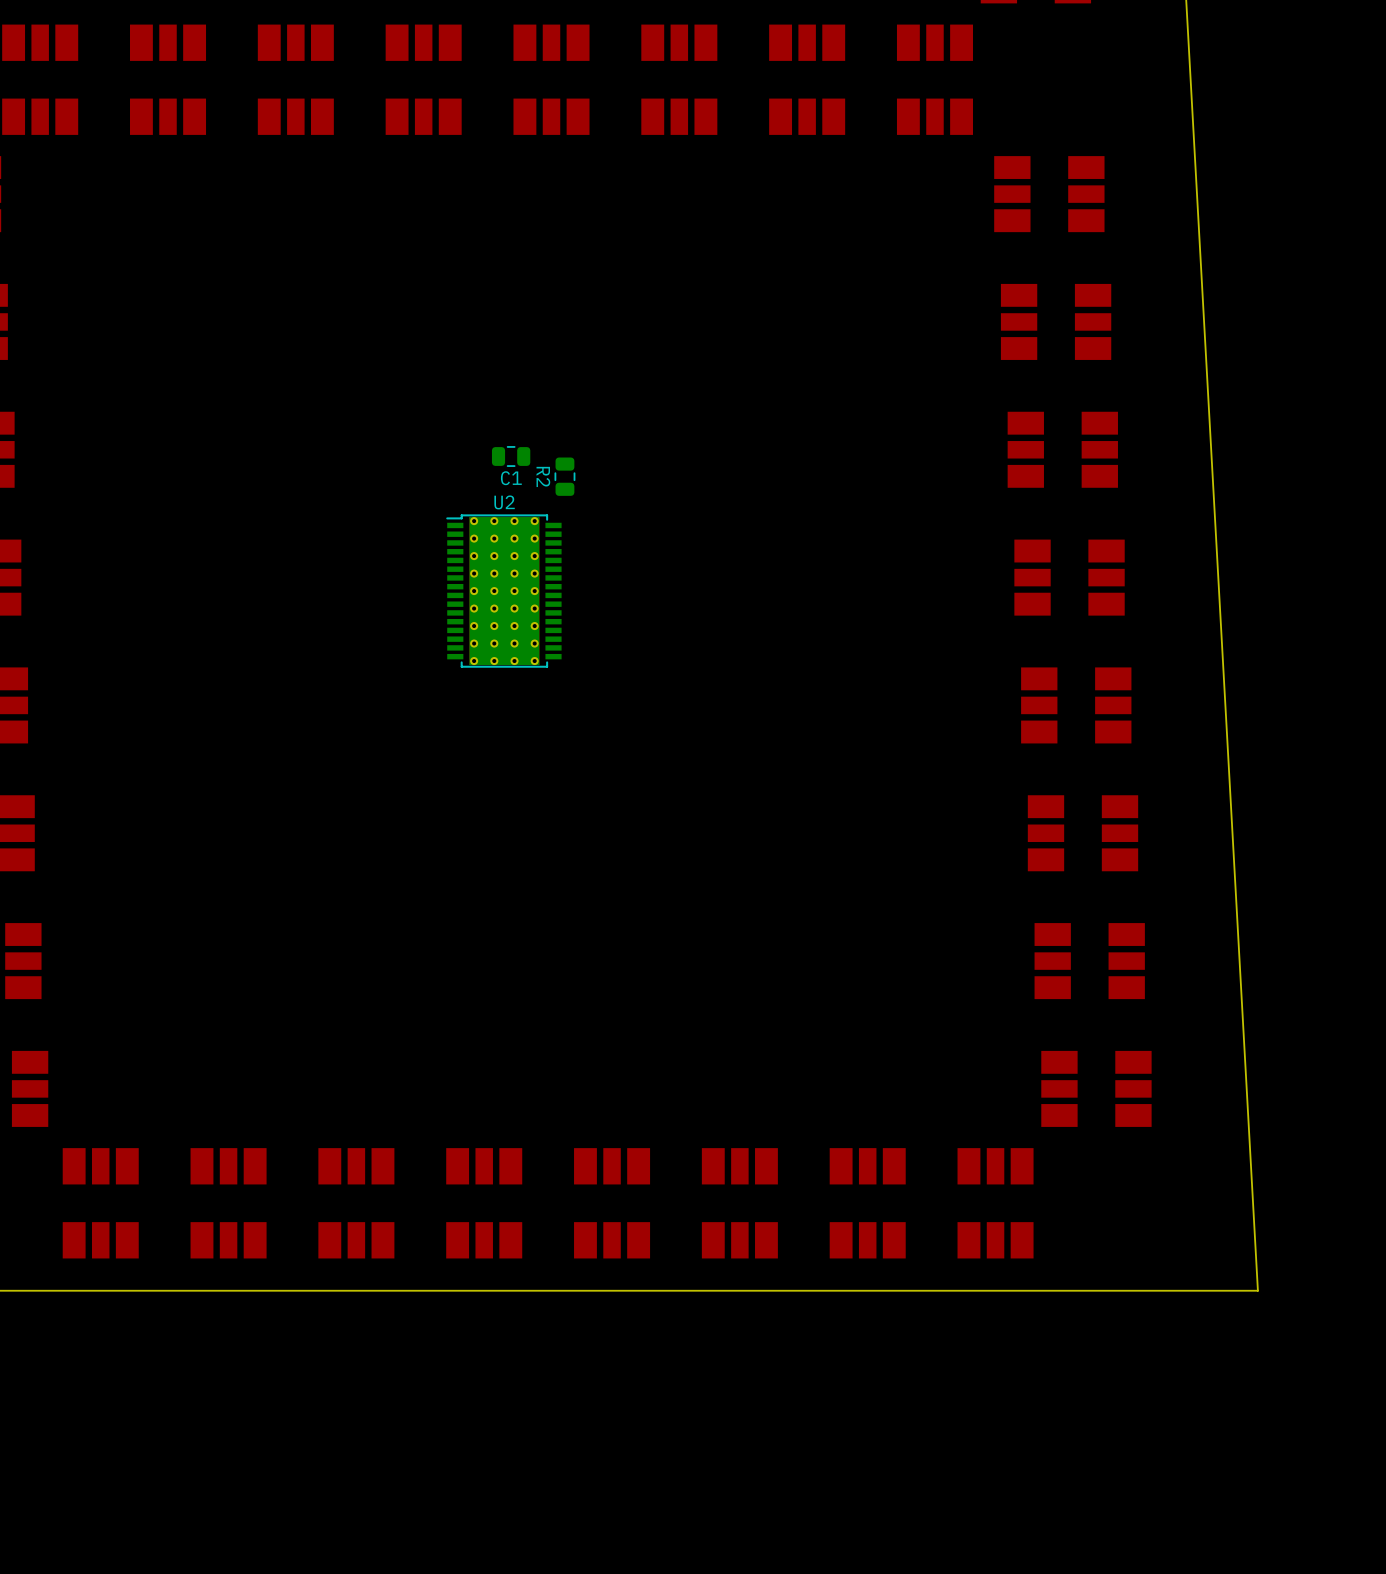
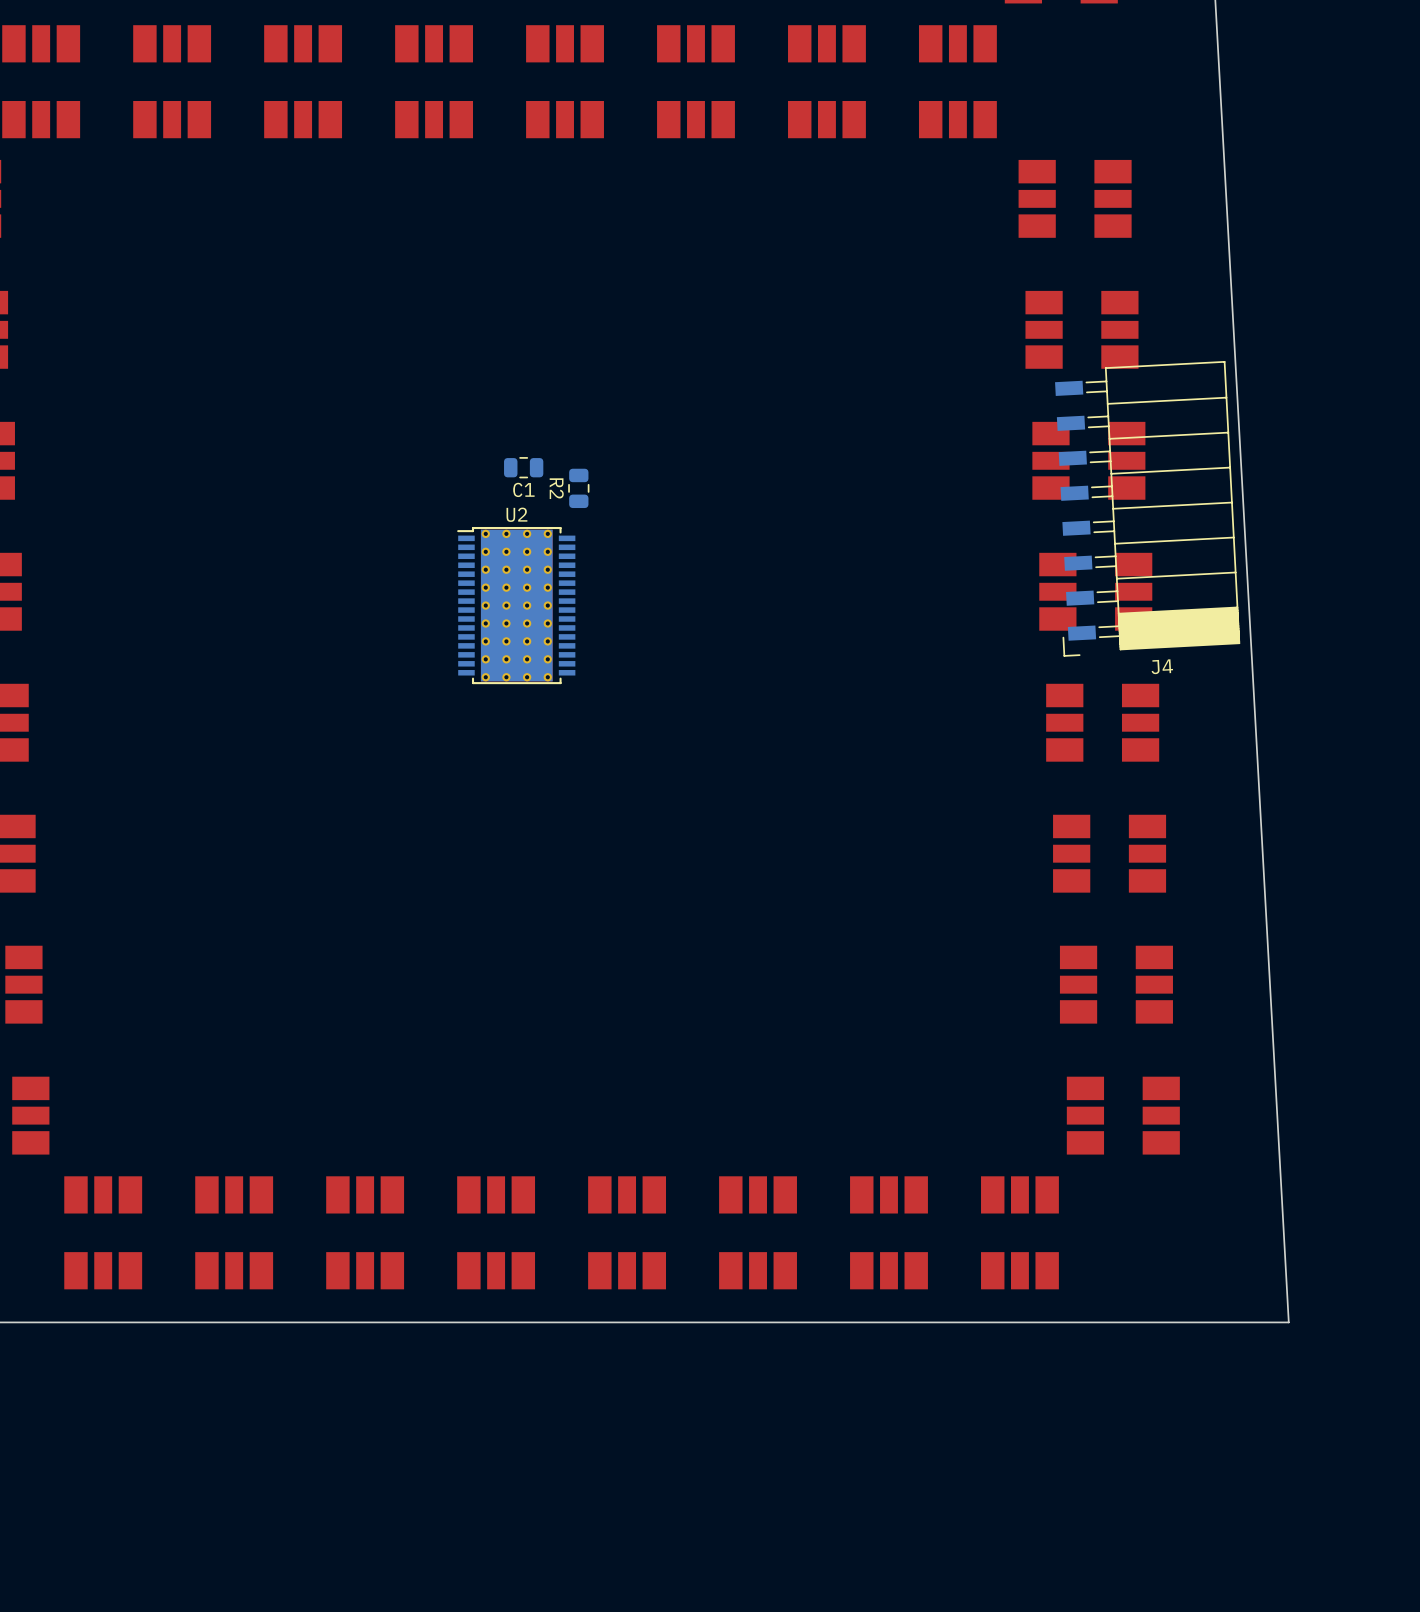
J4: none -> (1147, 508)

